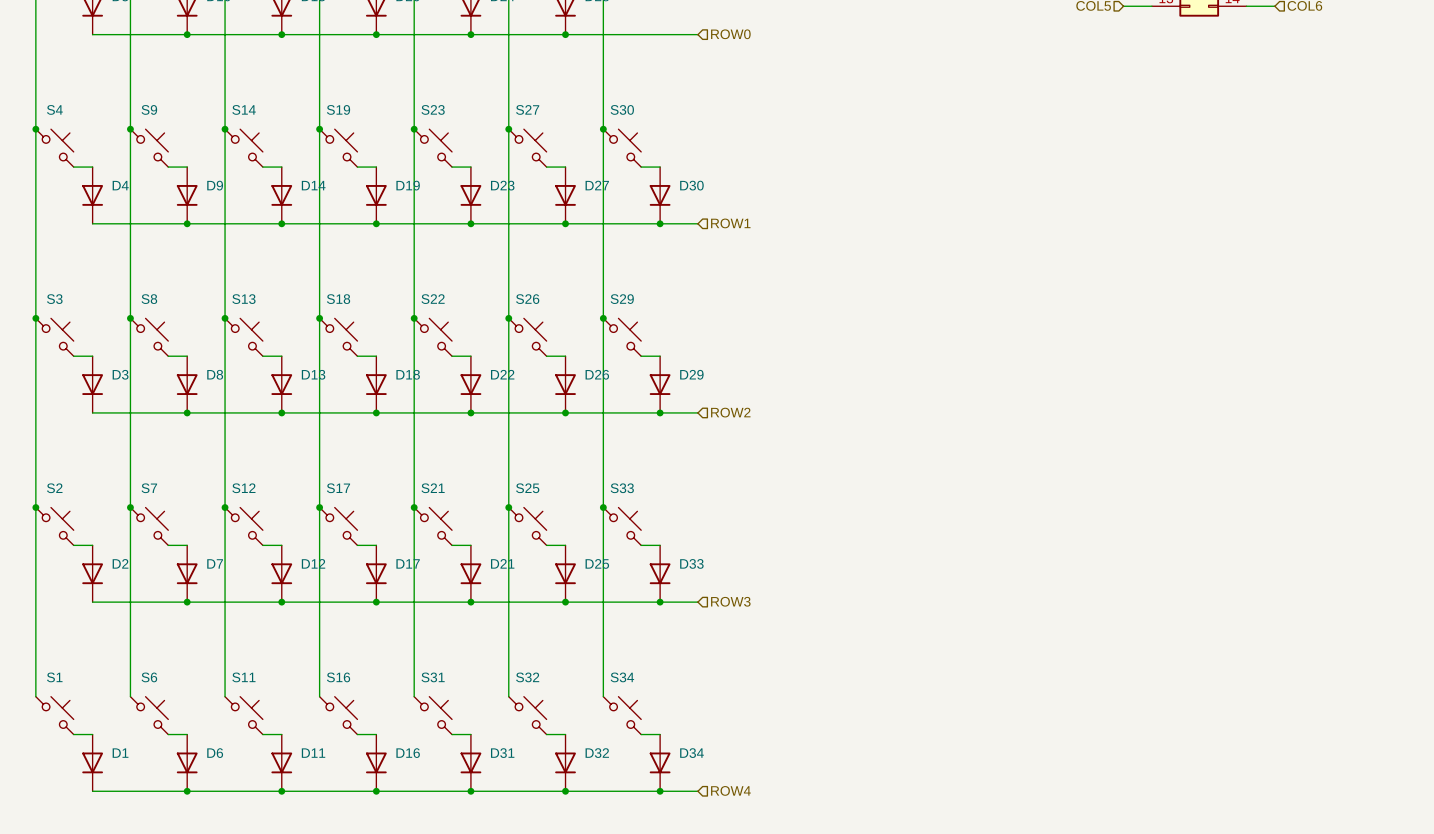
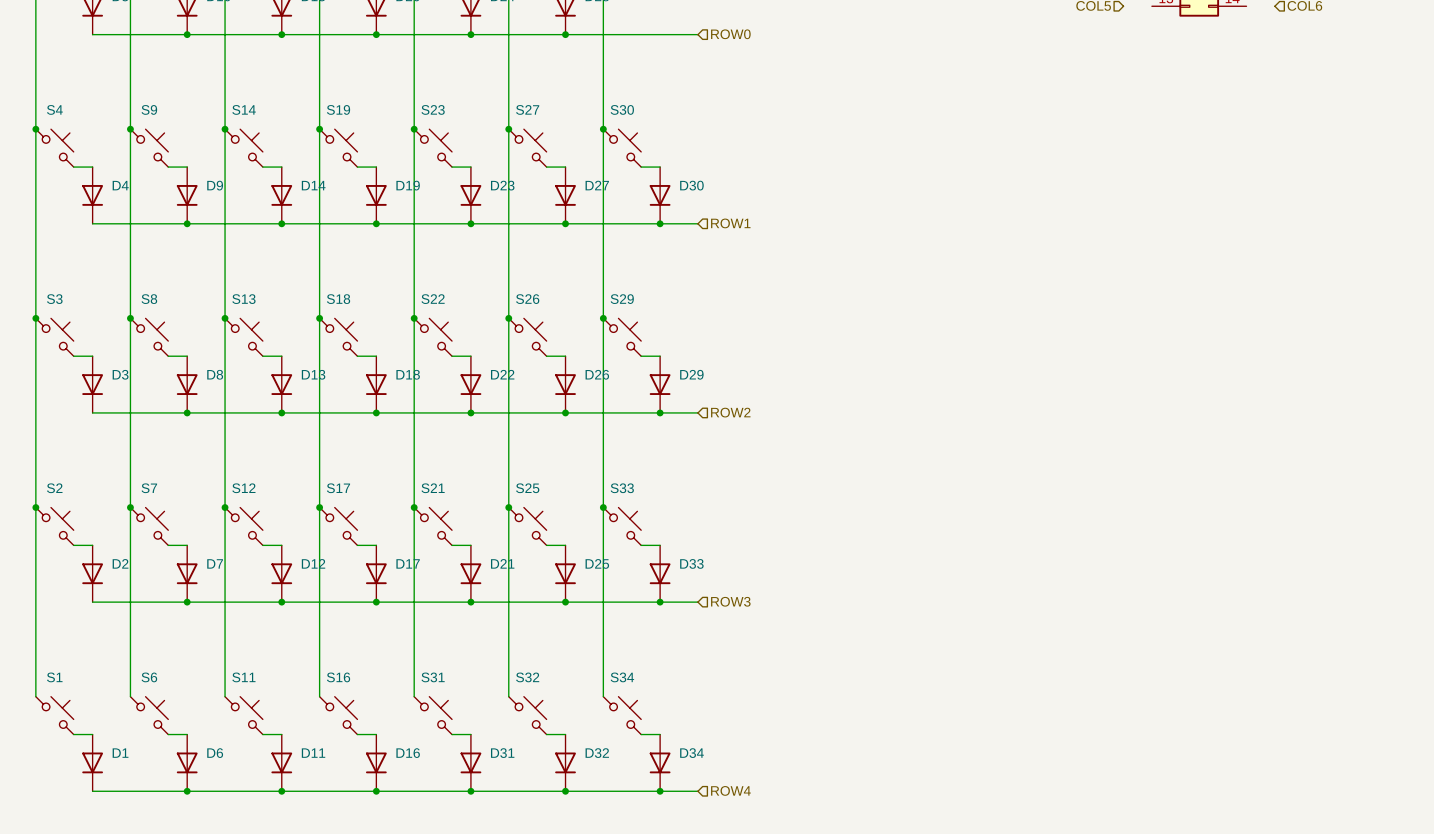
wire: (1123, 6) (1151, 6) -> none
wire: (1246, 6) (1274, 6) -> none

